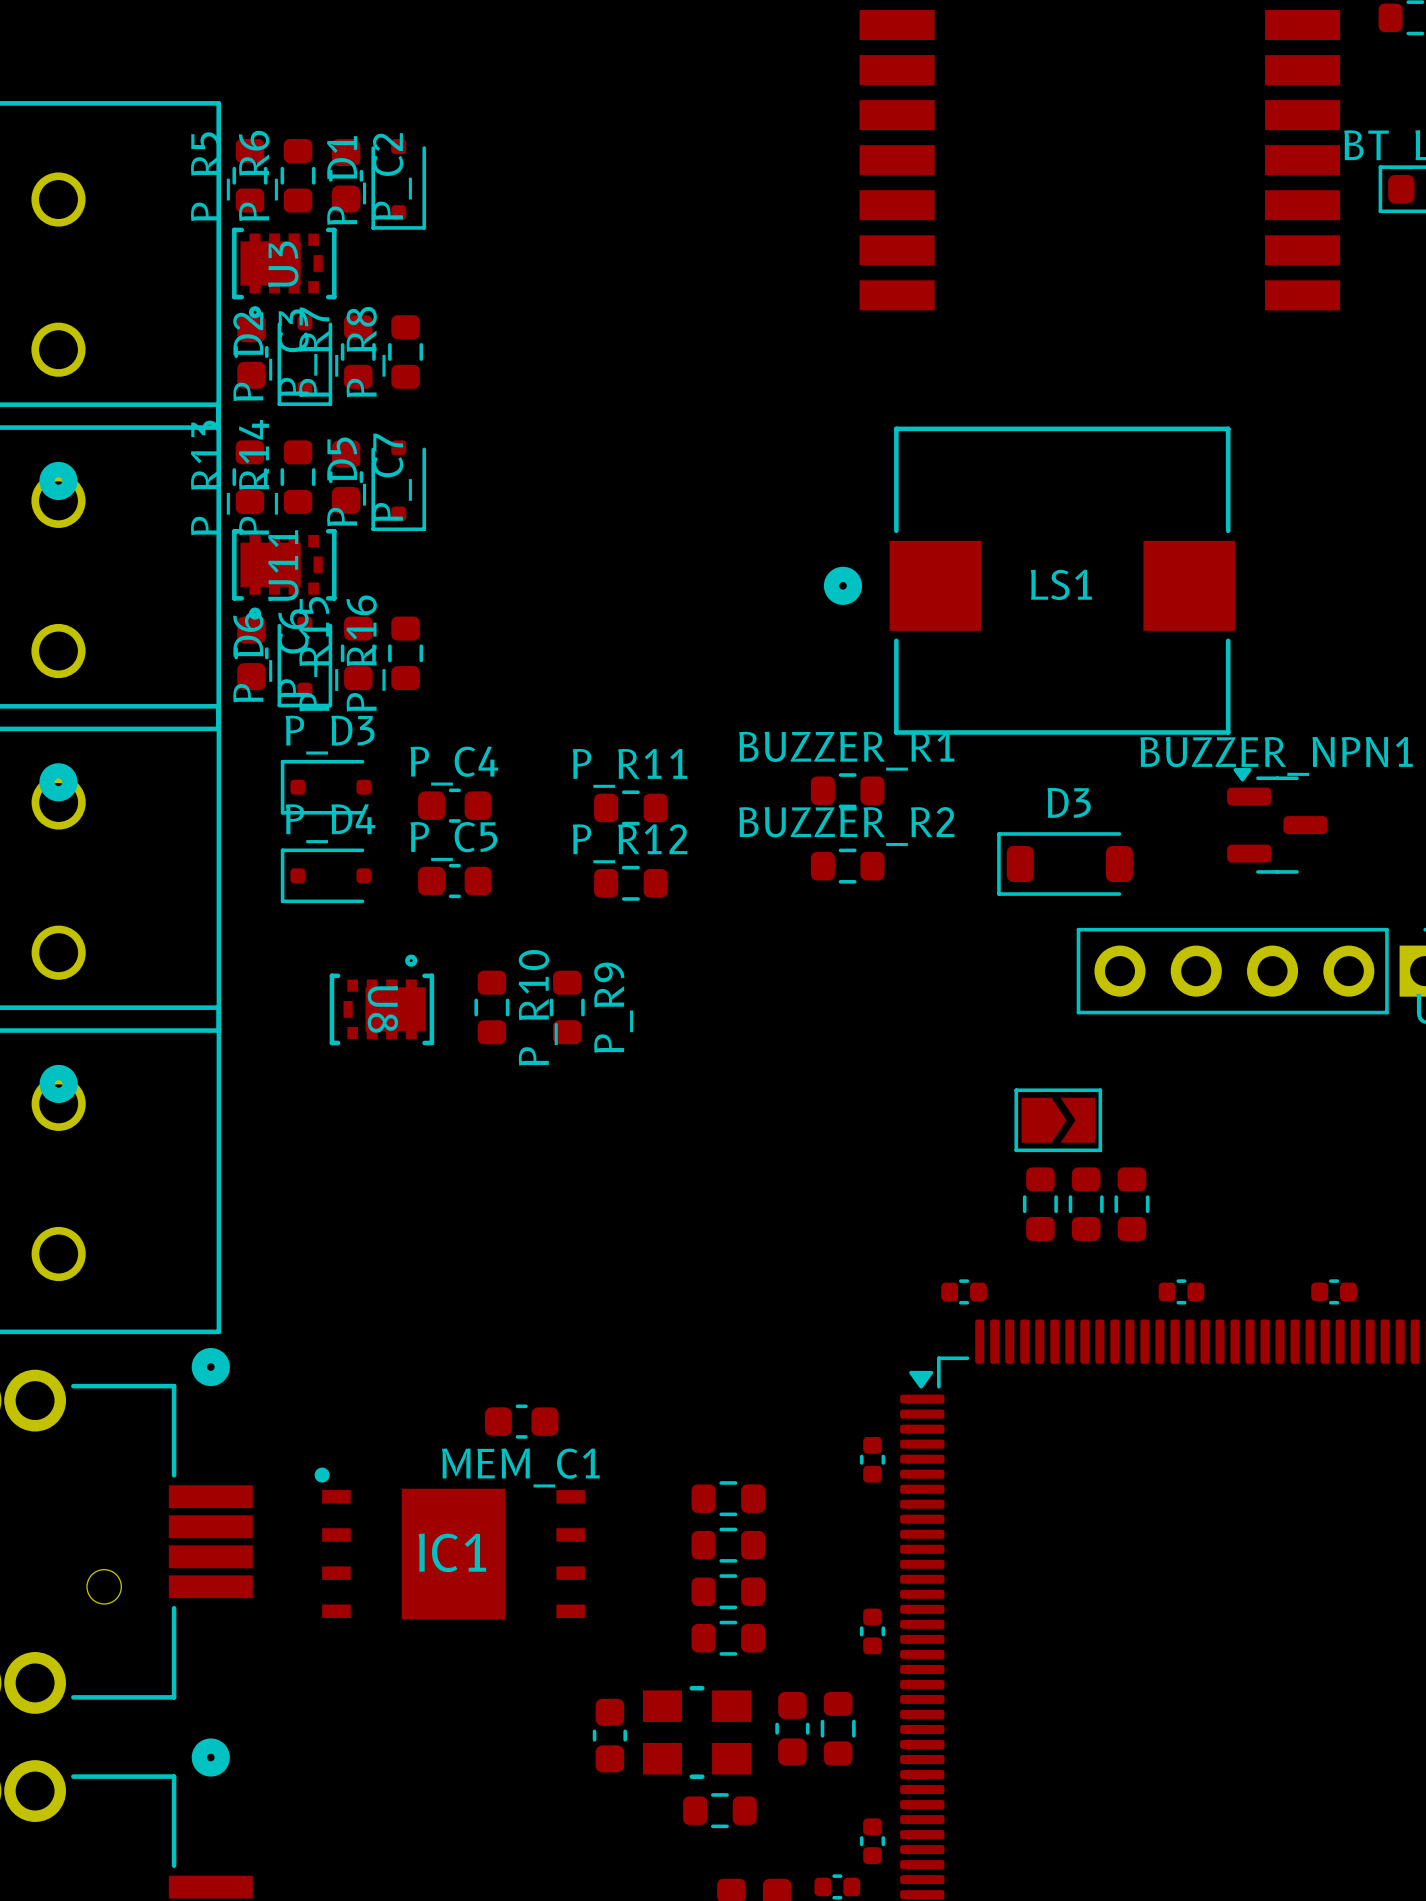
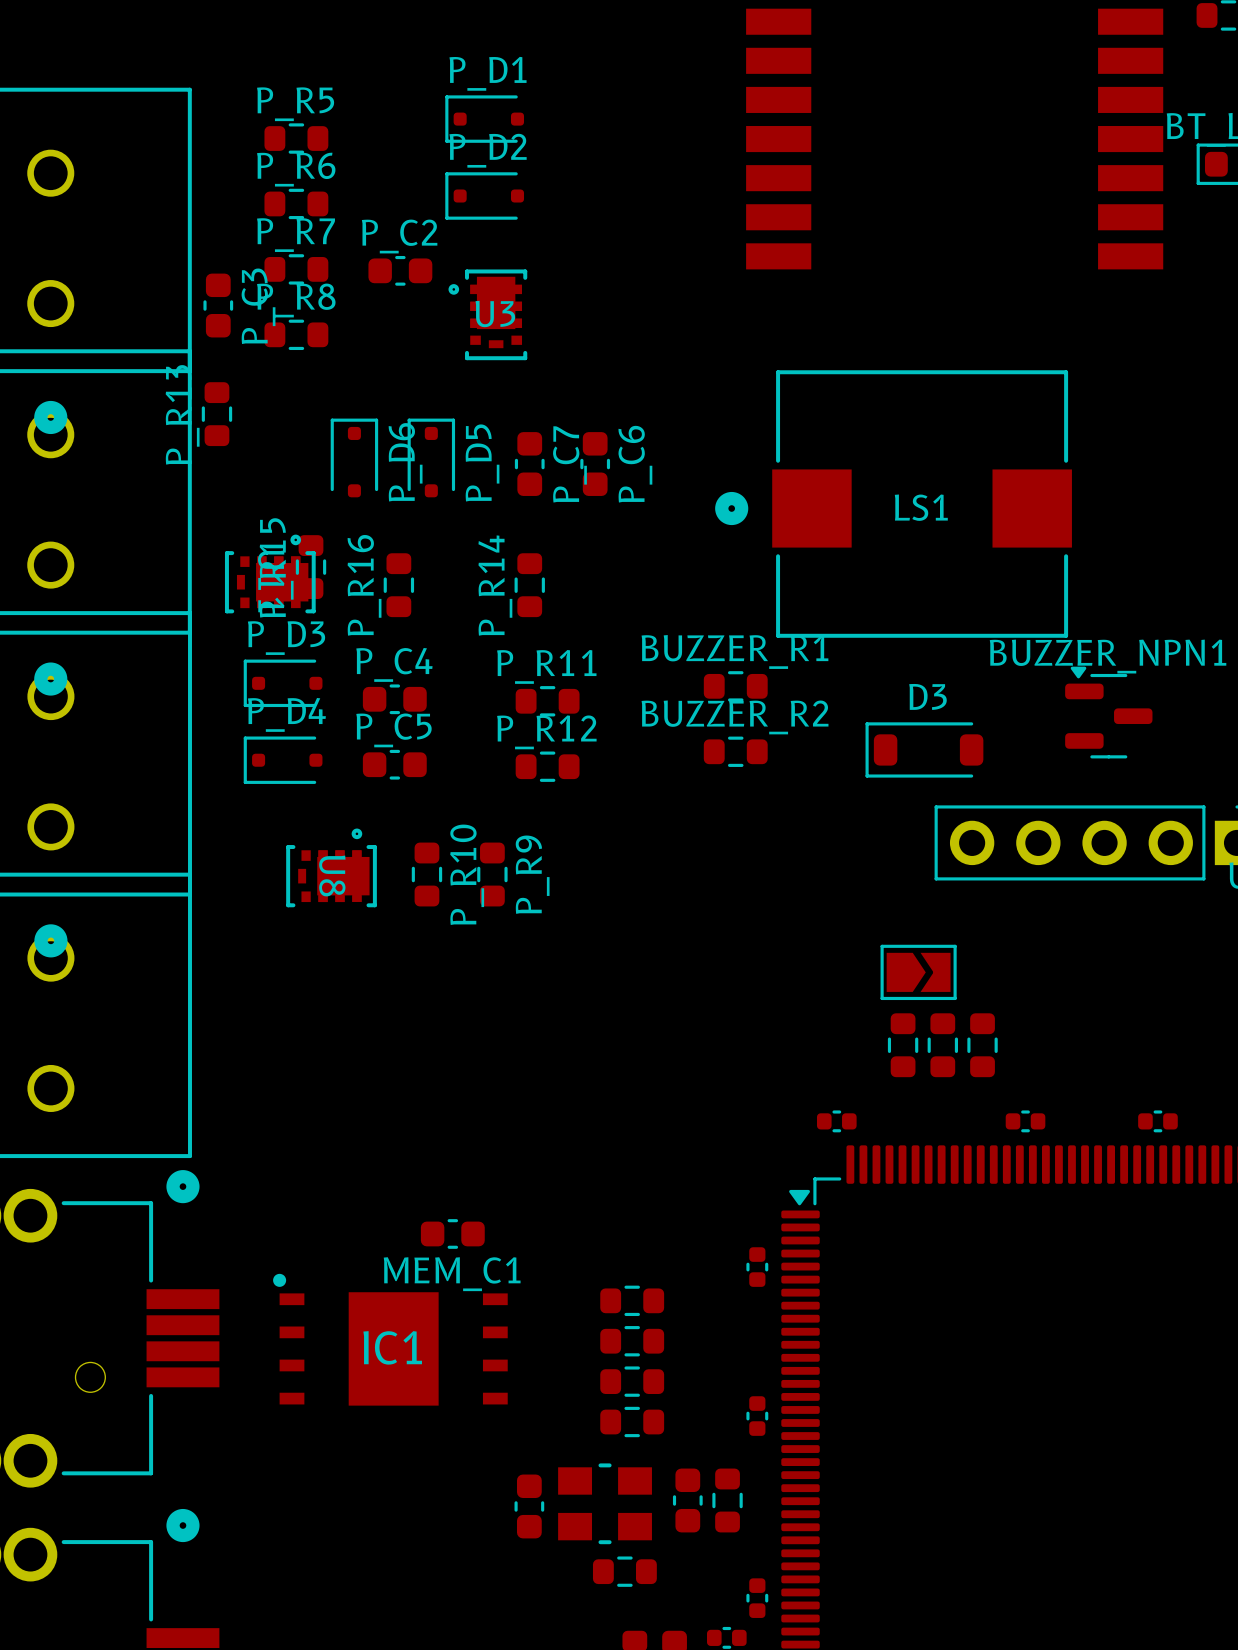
P_R5 rotation: 0° (249, 175) -> 90° clockwise (296, 138)
P_R5 position: (249, 175) -> (296, 138)
P_R6 rotation: 0° (298, 175) -> 90° clockwise (296, 203)
P_R6 position: (298, 175) -> (296, 203)
P_C2 rotation: 0° (346, 175) -> 90° clockwise (400, 270)
P_C2 position: (346, 175) -> (400, 270)
P_C2 name position: P_C2 (392, 176) -> P_C2 (399, 236)
P_D1 rotation: 0° (398, 184) -> 90° clockwise (484, 119)
P_D1 position: (398, 184) -> (484, 119)
U3 rotation: 0° (284, 272) -> 90° clockwise (487, 314)
U3 position: (284, 272) -> (487, 314)
P_R7 rotation: 0° (358, 351) -> 90° clockwise (296, 269)
P_R7 position: (358, 351) -> (296, 269)
P_R8 rotation: 0° (405, 351) -> 90° clockwise (296, 334)
P_R8 position: (405, 351) -> (296, 334)
P_D2 rotation: 0° (304, 360) -> 90° clockwise (484, 196)
P_D2 position: (304, 360) -> (484, 196)
P_R14 position: (298, 477) -> (529, 585)
P_C7 position: (346, 477) -> (529, 464)
P_D5 rotation: 0° (398, 485) -> 180° (431, 457)
P_D5 position: (398, 485) -> (431, 457)
U11 rotation: 0° (284, 574) -> 180° (270, 573)
U11 position: (284, 574) -> (270, 573)
P_C6 position: (251, 653) -> (595, 464)
P_R16 position: (405, 653) -> (398, 585)
P_D6 rotation: 0° (304, 661) -> 180° (354, 457)
P_D6 position: (304, 661) -> (354, 457)

